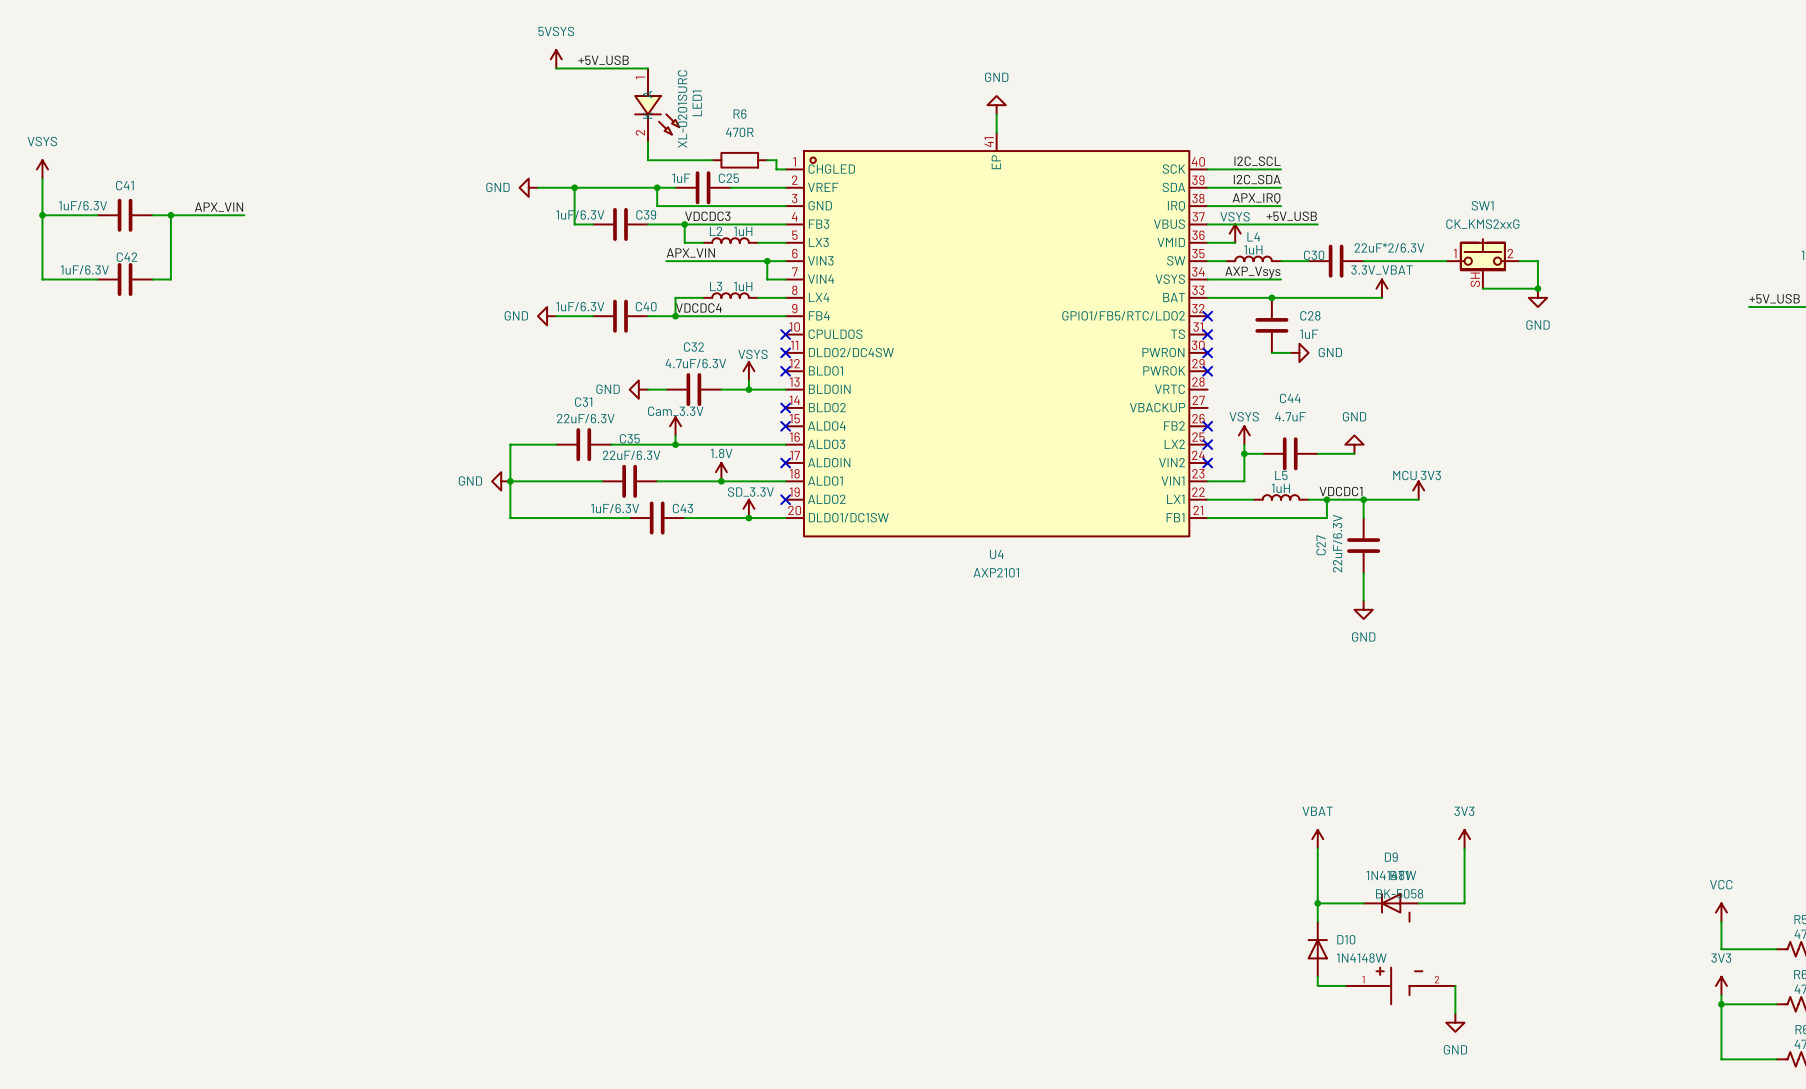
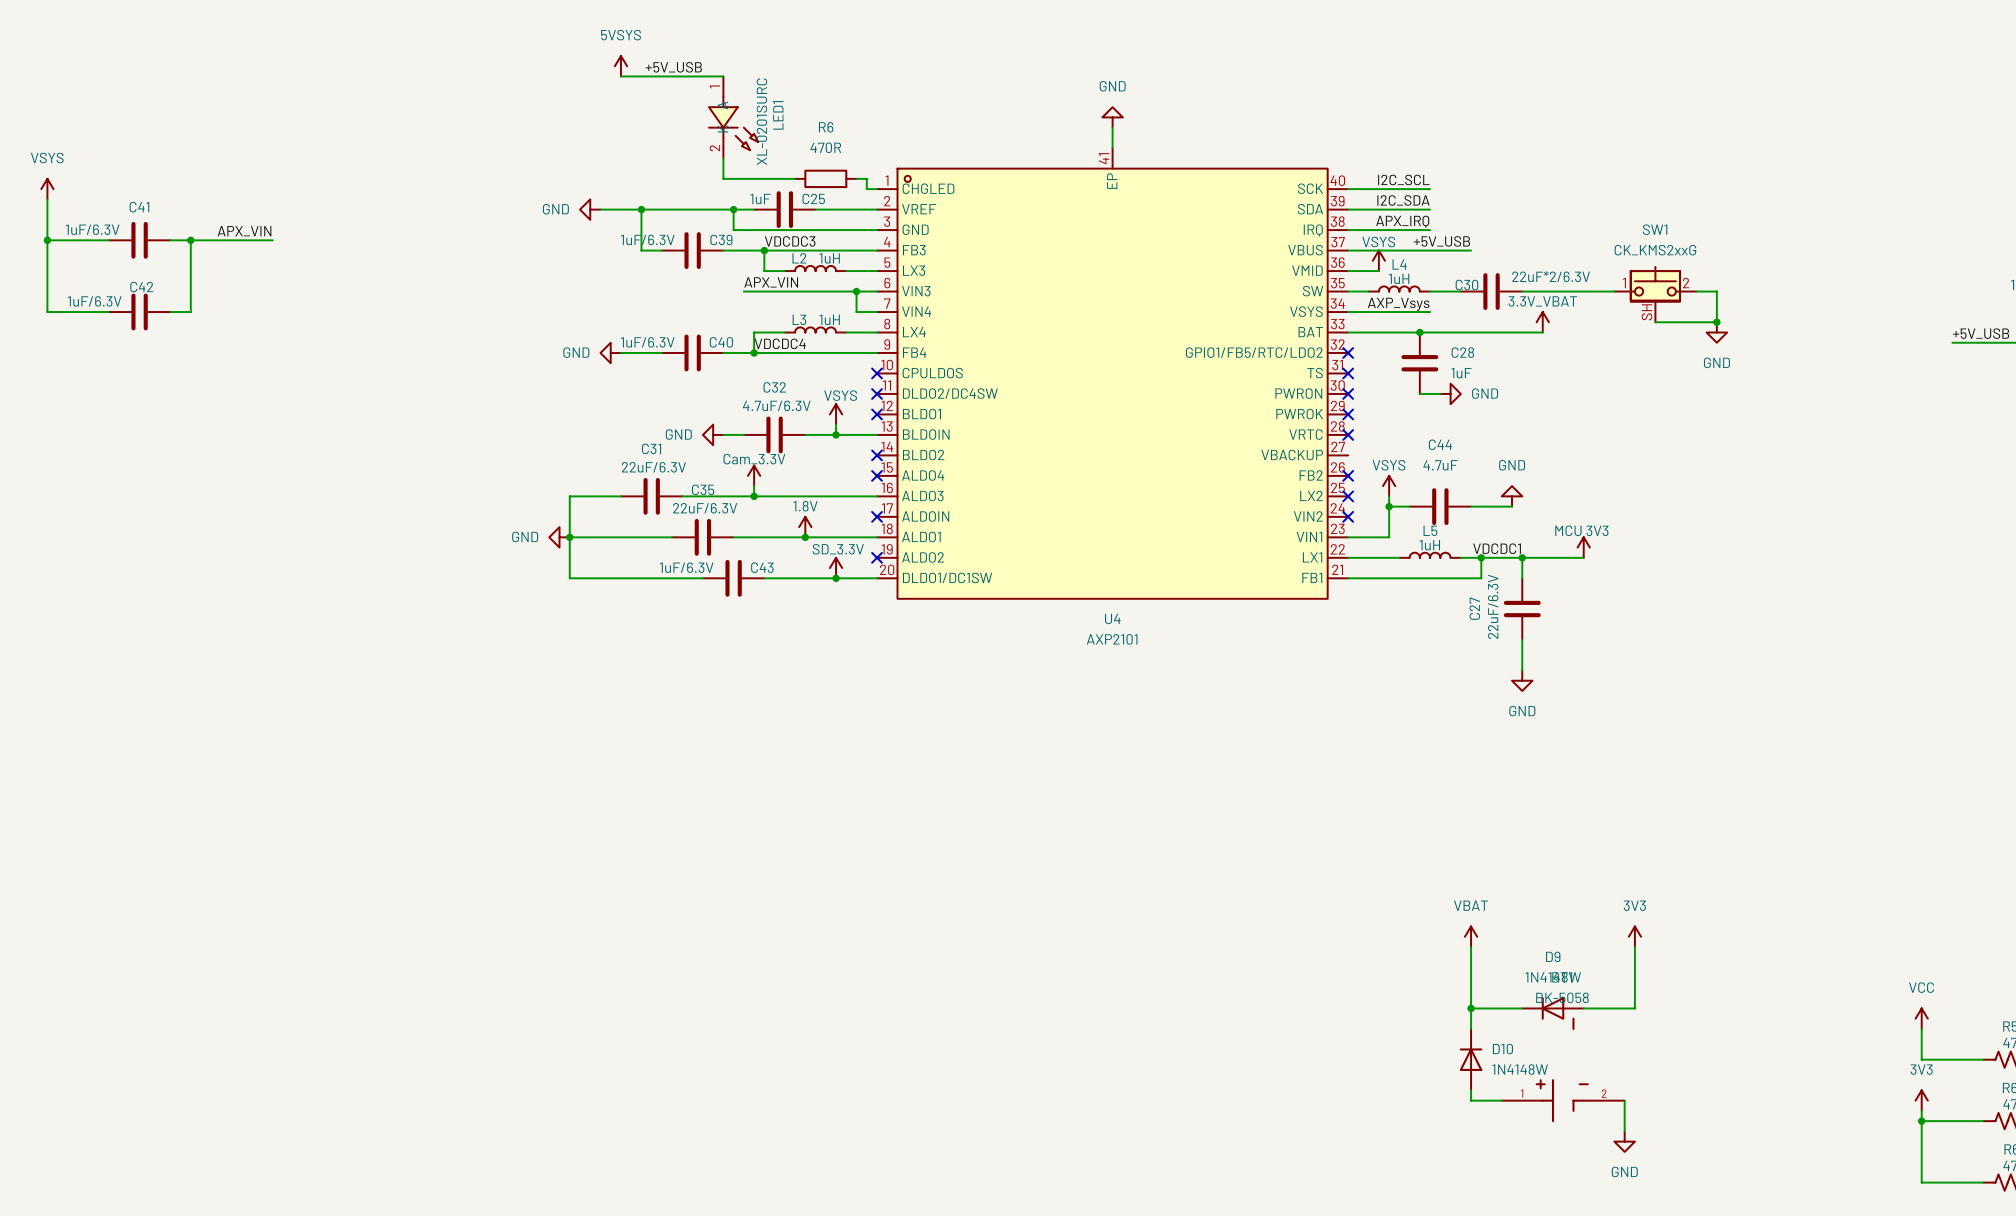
no-connect mark: none -> (1348, 434)

